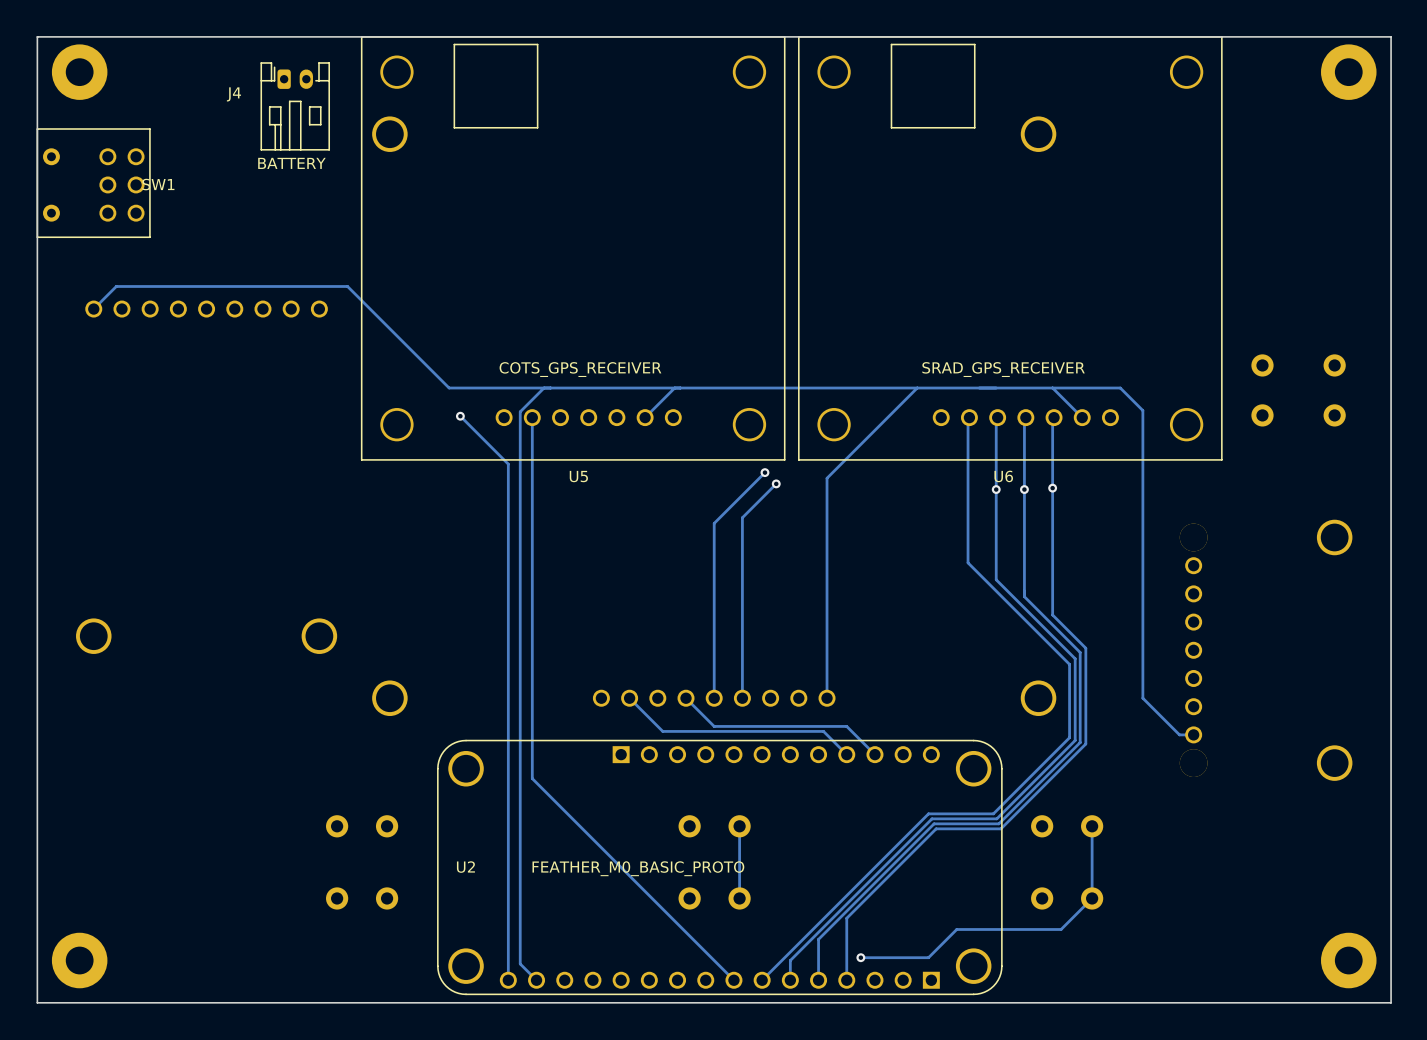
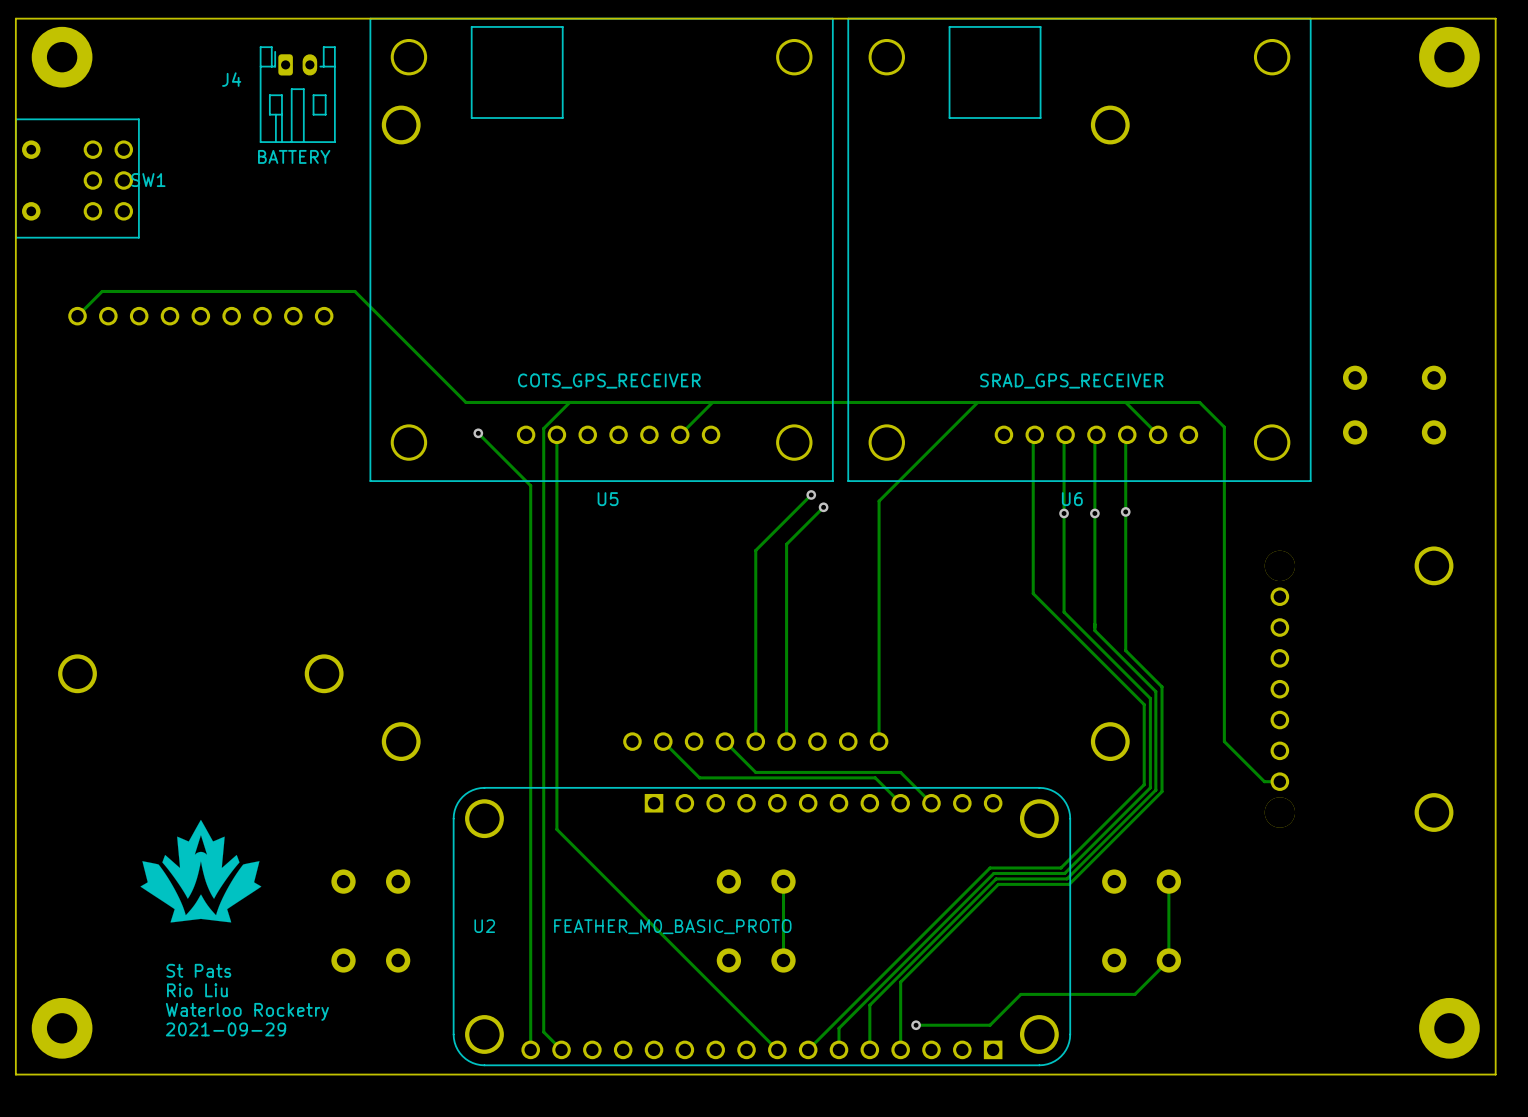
drawing: none -> [140, 819, 262, 923]
text: none -> St Pats (198, 970)
text: none -> Rio Liu (197, 990)
text: none -> Waterloo Rocketry (247, 1011)
text: none -> 2021-09-29 (226, 1029)

